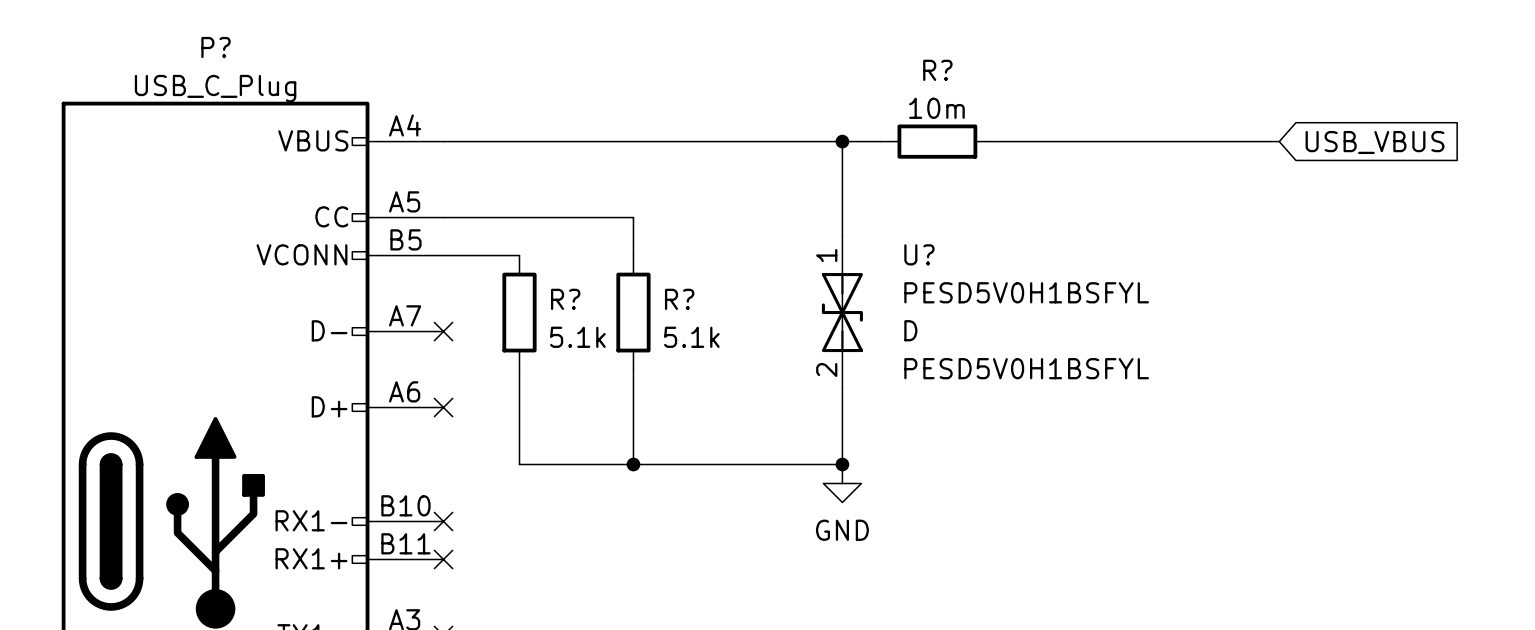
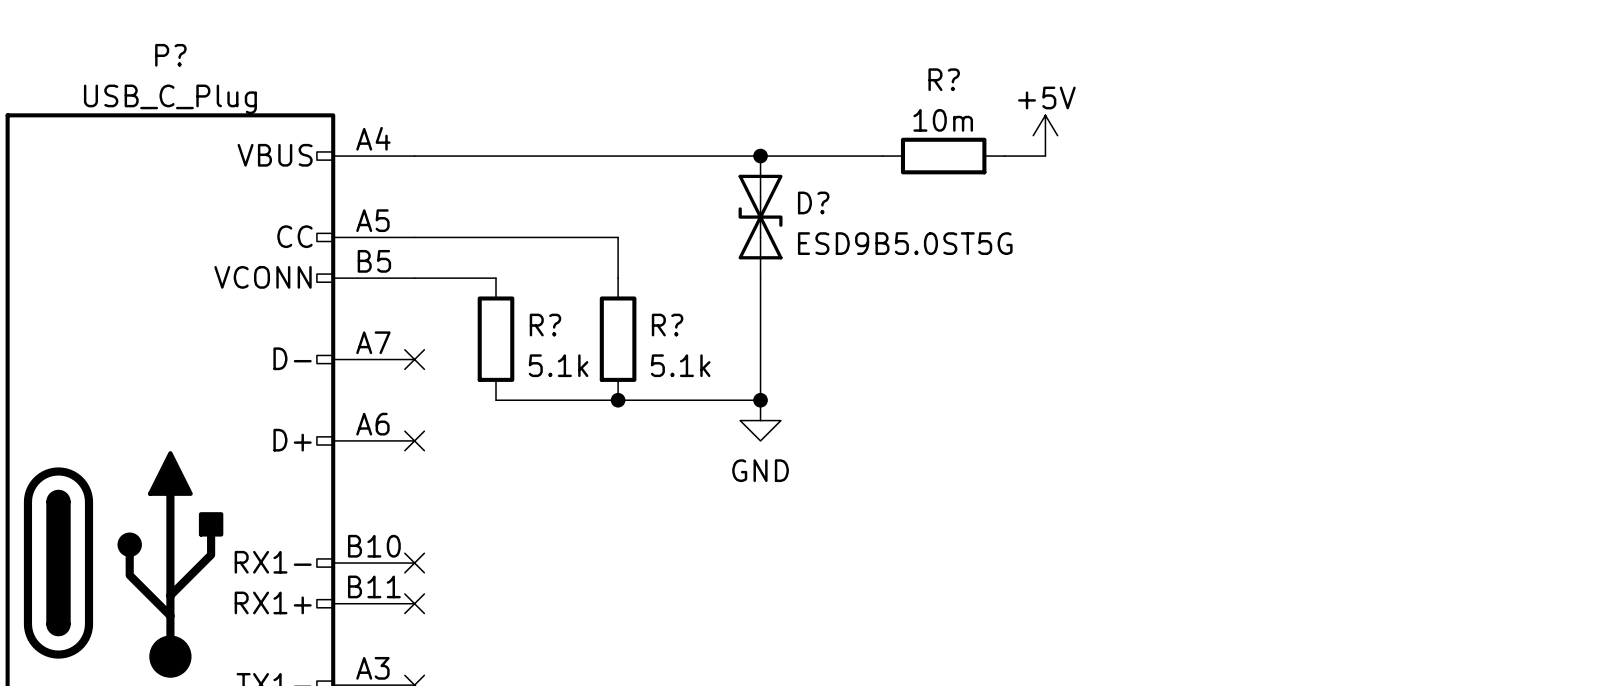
power symbol: none -> +5V (1045, 135)
wire: (842, 141) (842, 236) -> none
junction position: (842, 141) -> (760, 156)
wire: (1032, 141) (1279, 141) -> none
global label: USB_VBUS (1375, 142) -> none
D?: none -> ESD9B5.0ST5G (760, 217)
U?: PESD5V0H1BSFYL (842, 312) -> none
wire: (519, 369) (519, 464) (842, 464) (842, 388) -> (496, 400) (760, 400) (760, 278)
wire: (633, 369) (633, 464) -> none
junction: none -> (618, 400)
junction: none -> (760, 400)
junction: (633, 464) -> none
junction: (842, 464) -> none
power symbol position: GND (842, 483) -> GND (760, 420)

